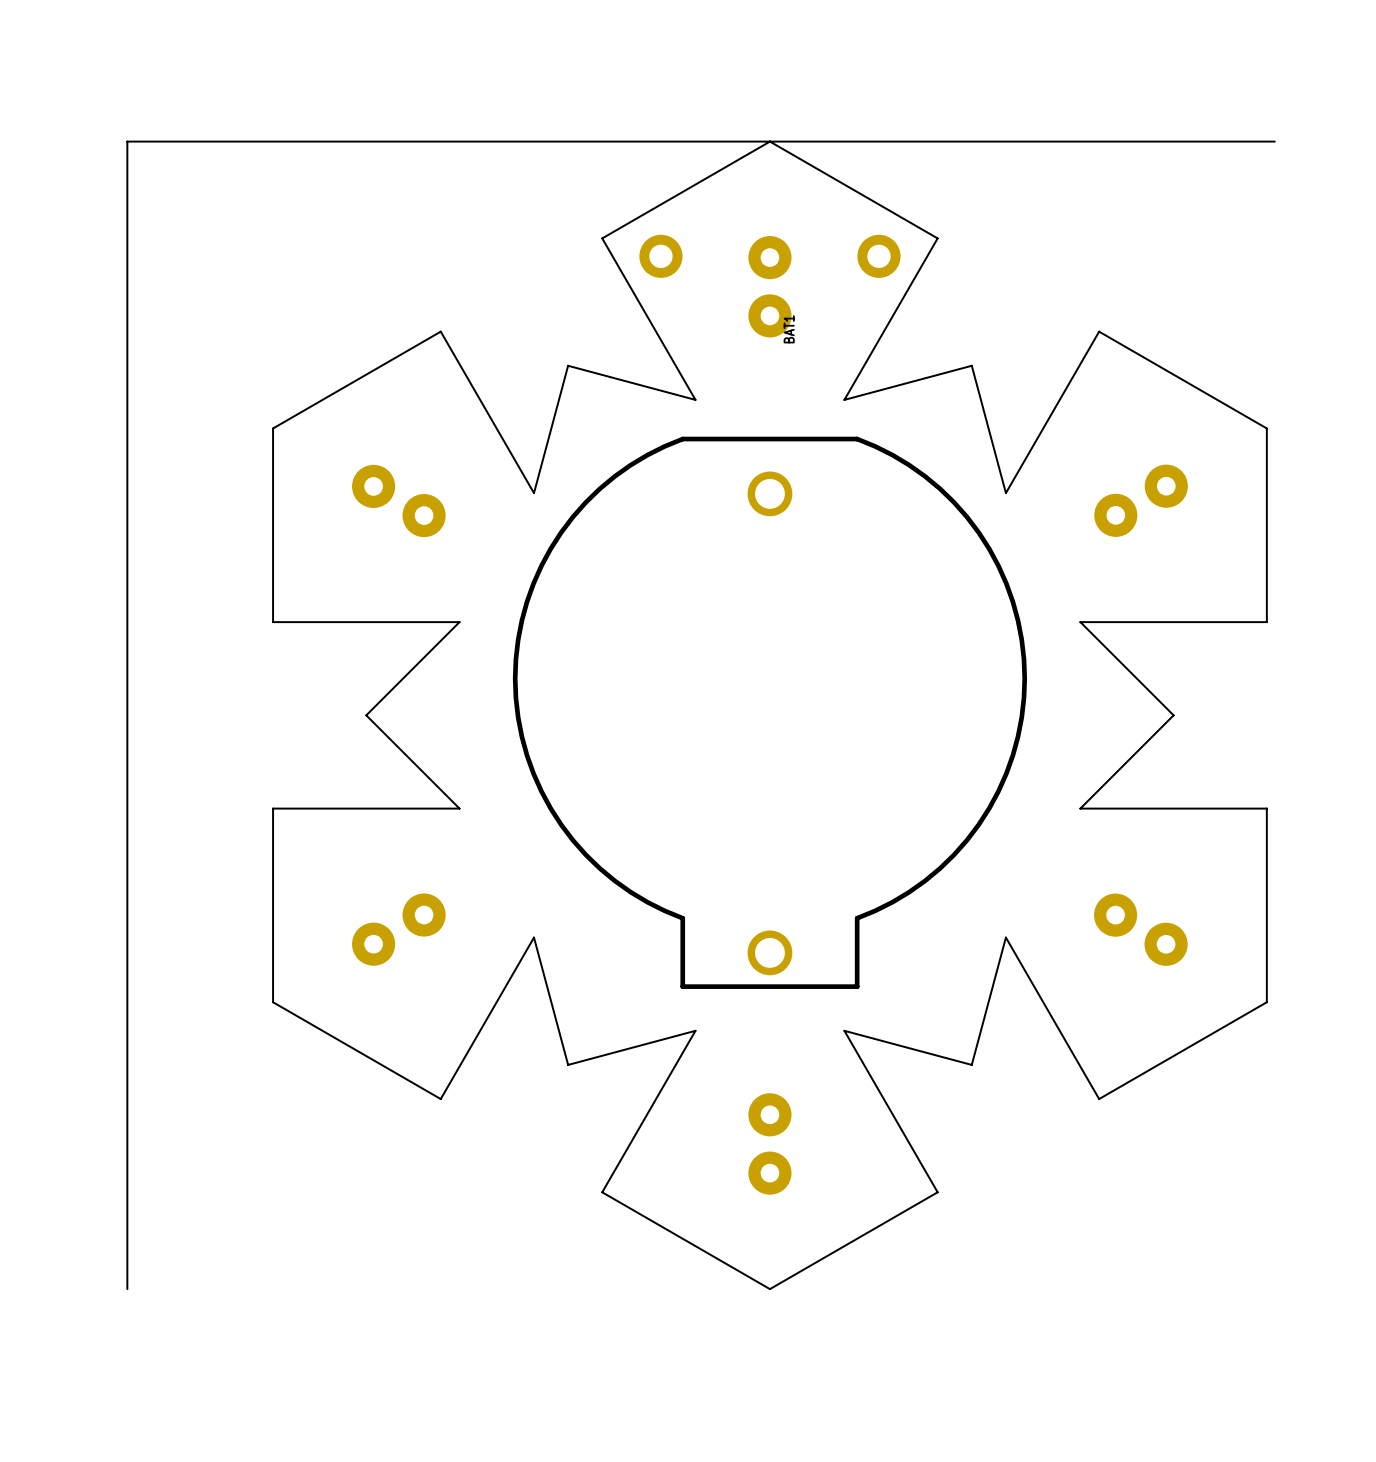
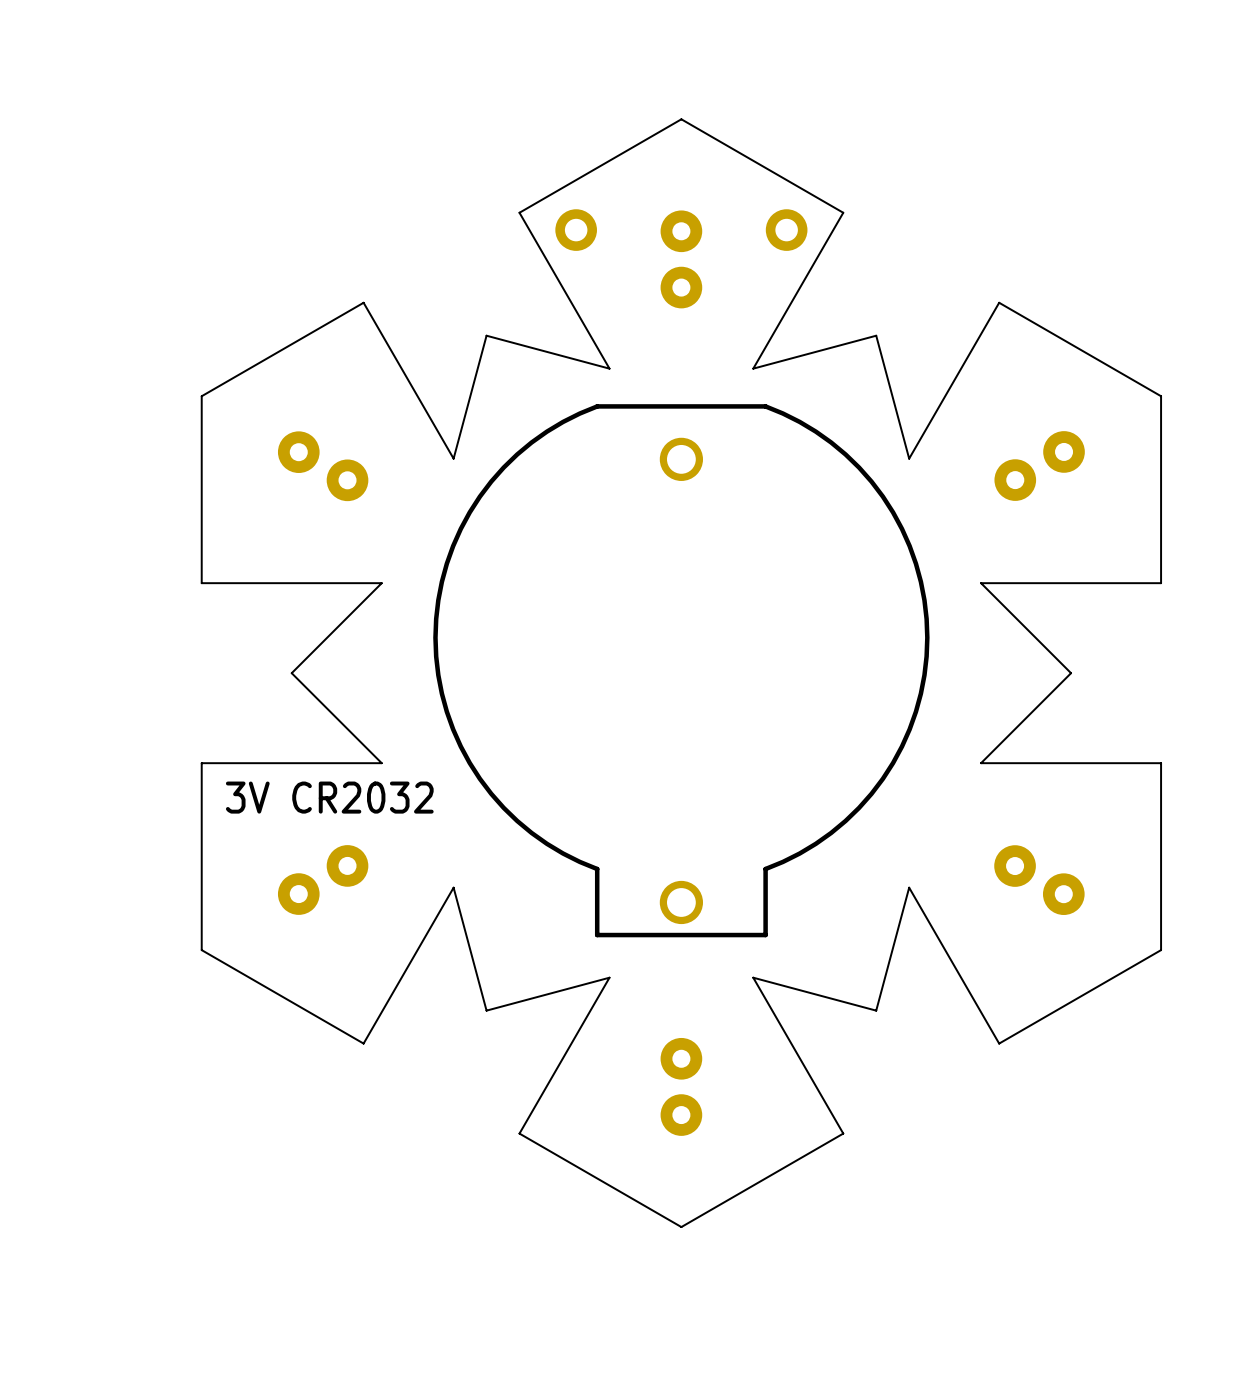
board edge: (1274, 141) (127, 141) (127, 1289) -> none
BAT1 name: BAT1 (789, 329) -> none
text: none -> 3V CR2032 (329, 797)

